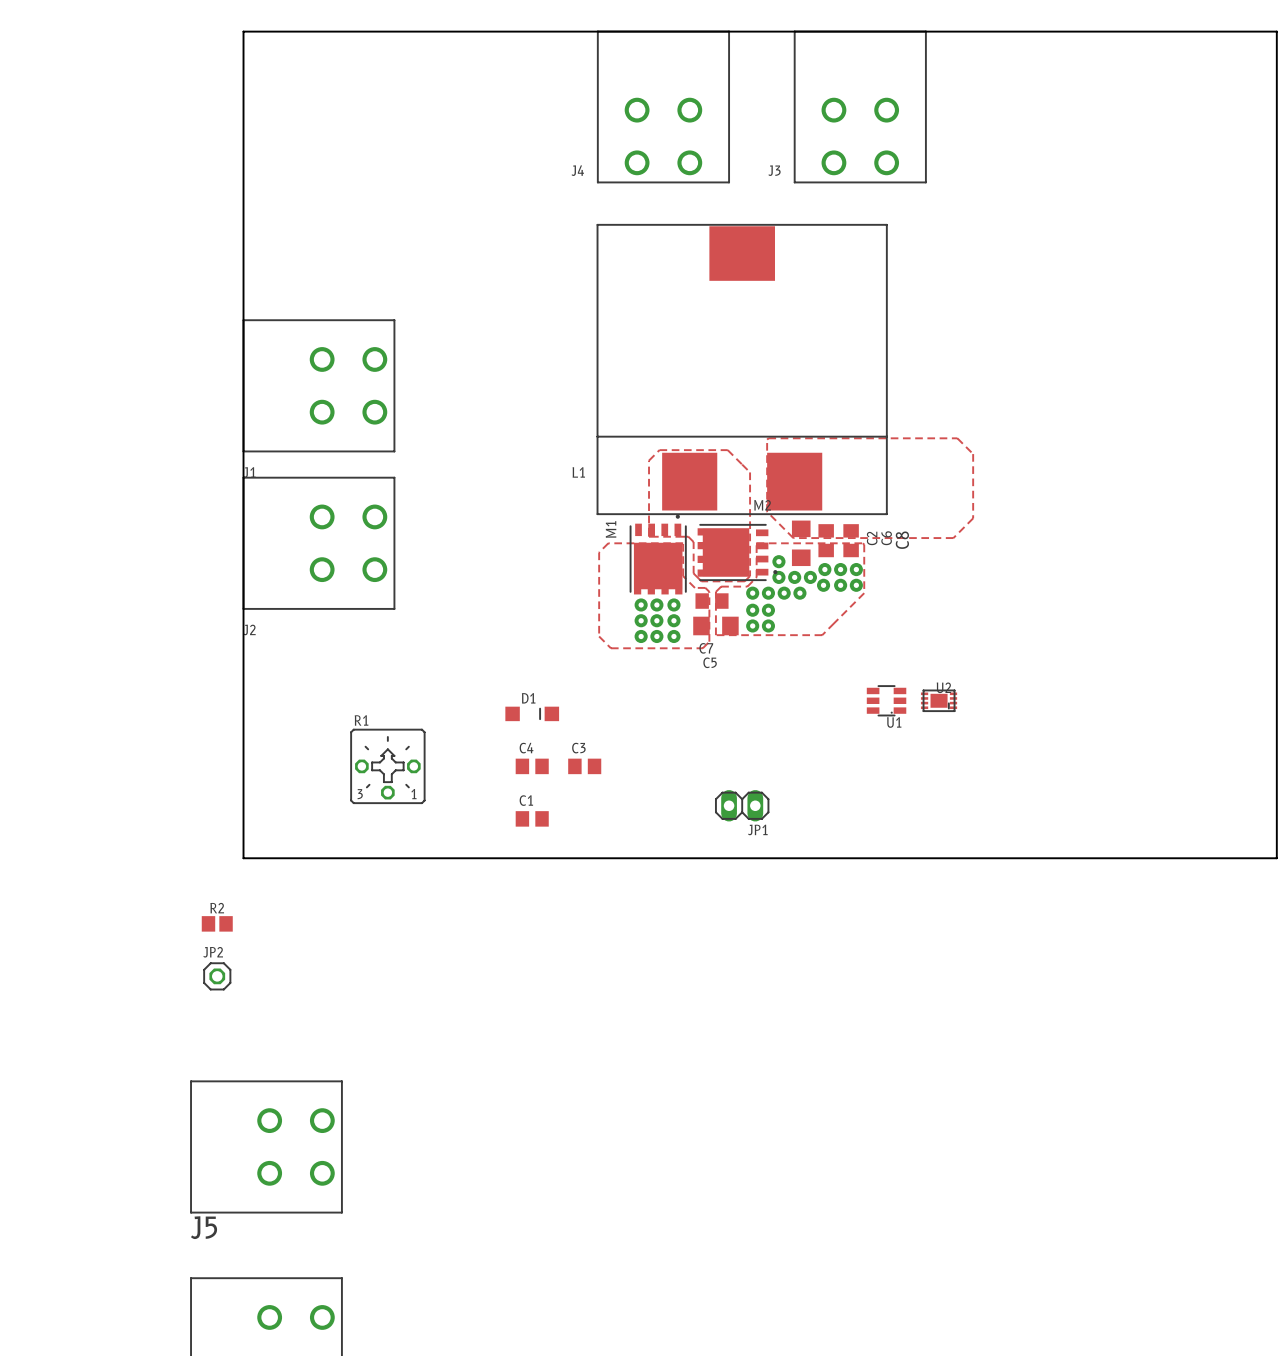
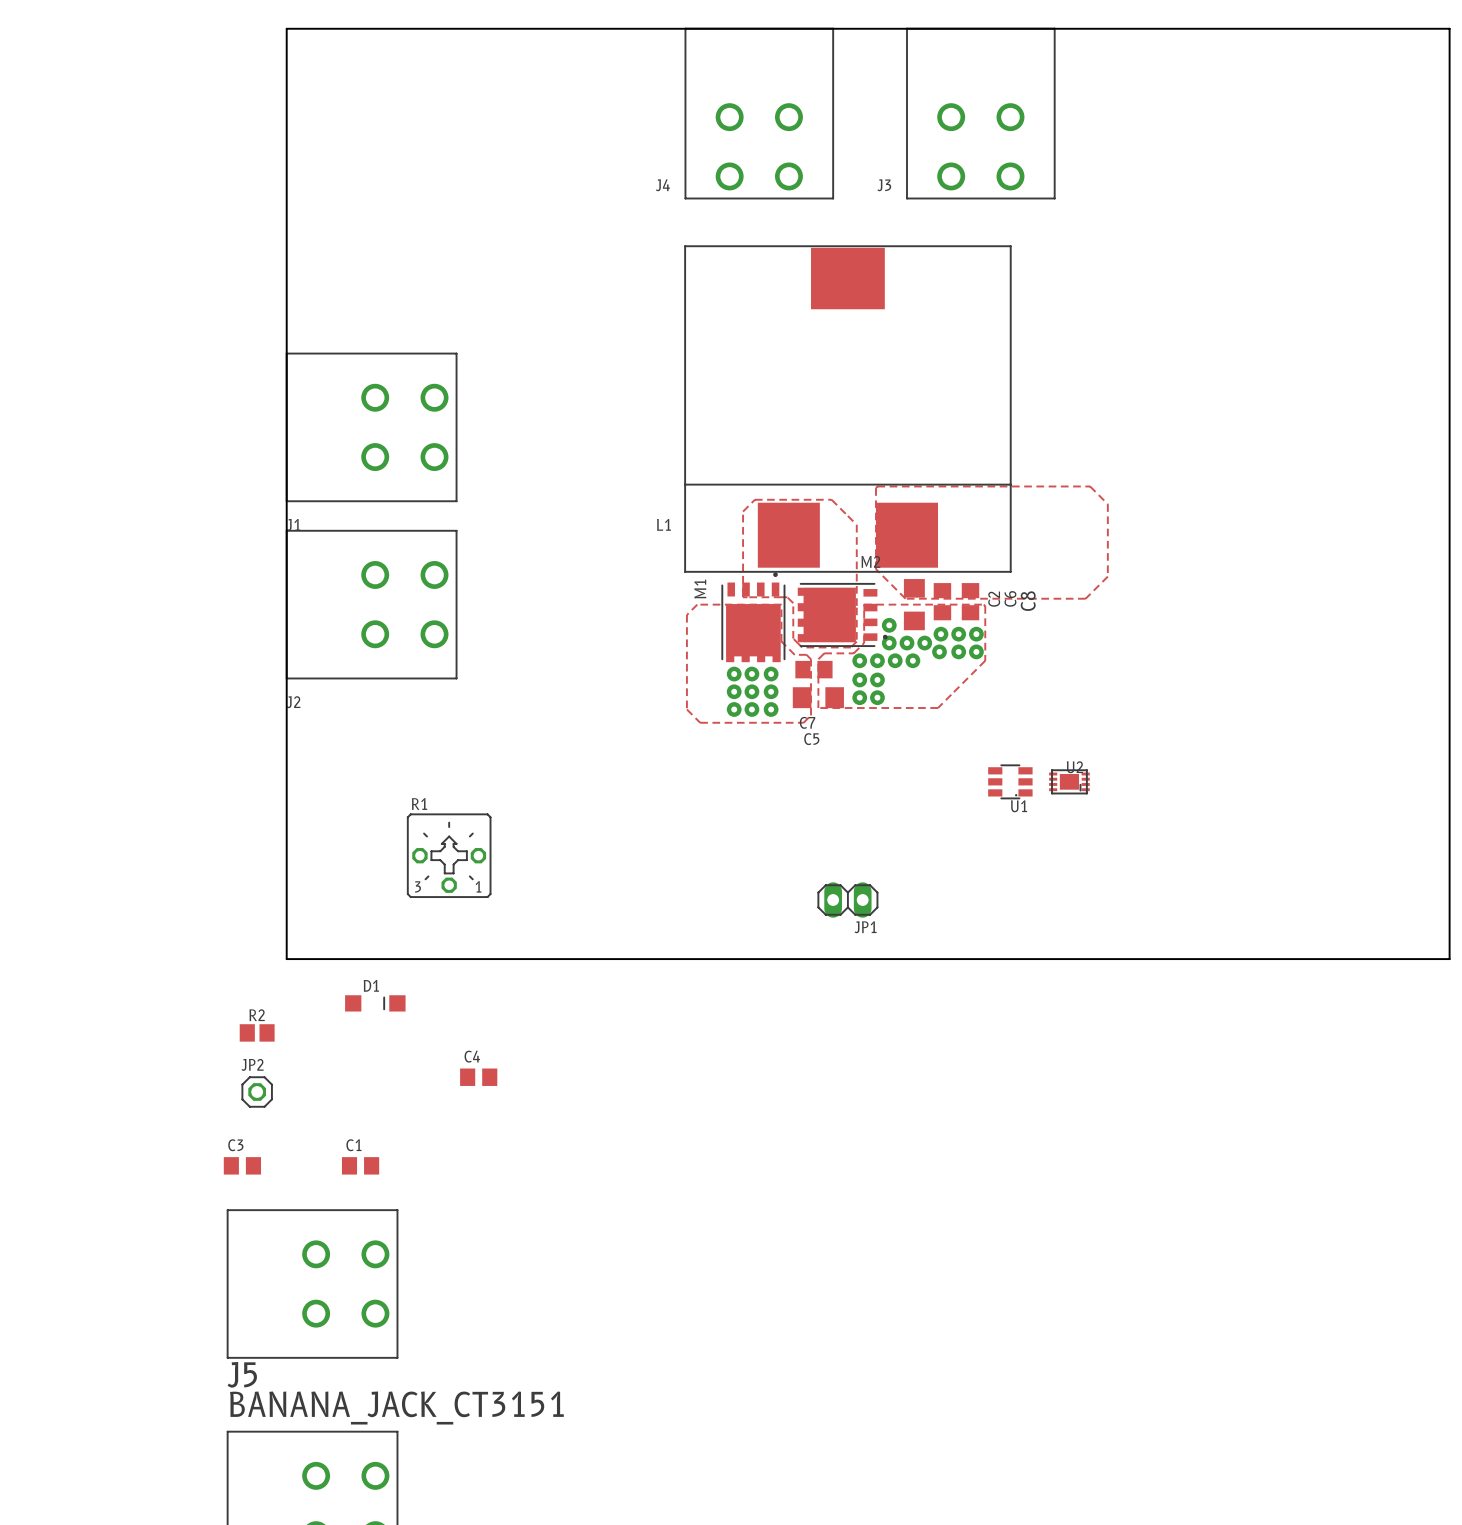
D1 position: (532, 713) -> (375, 1003)
C4 position: (532, 766) -> (478, 1077)
C3 position: (584, 766) -> (242, 1165)
C1 position: (532, 818) -> (360, 1165)
J5 value: none -> BANANA_JACK_CT3151 (396, 1408)

